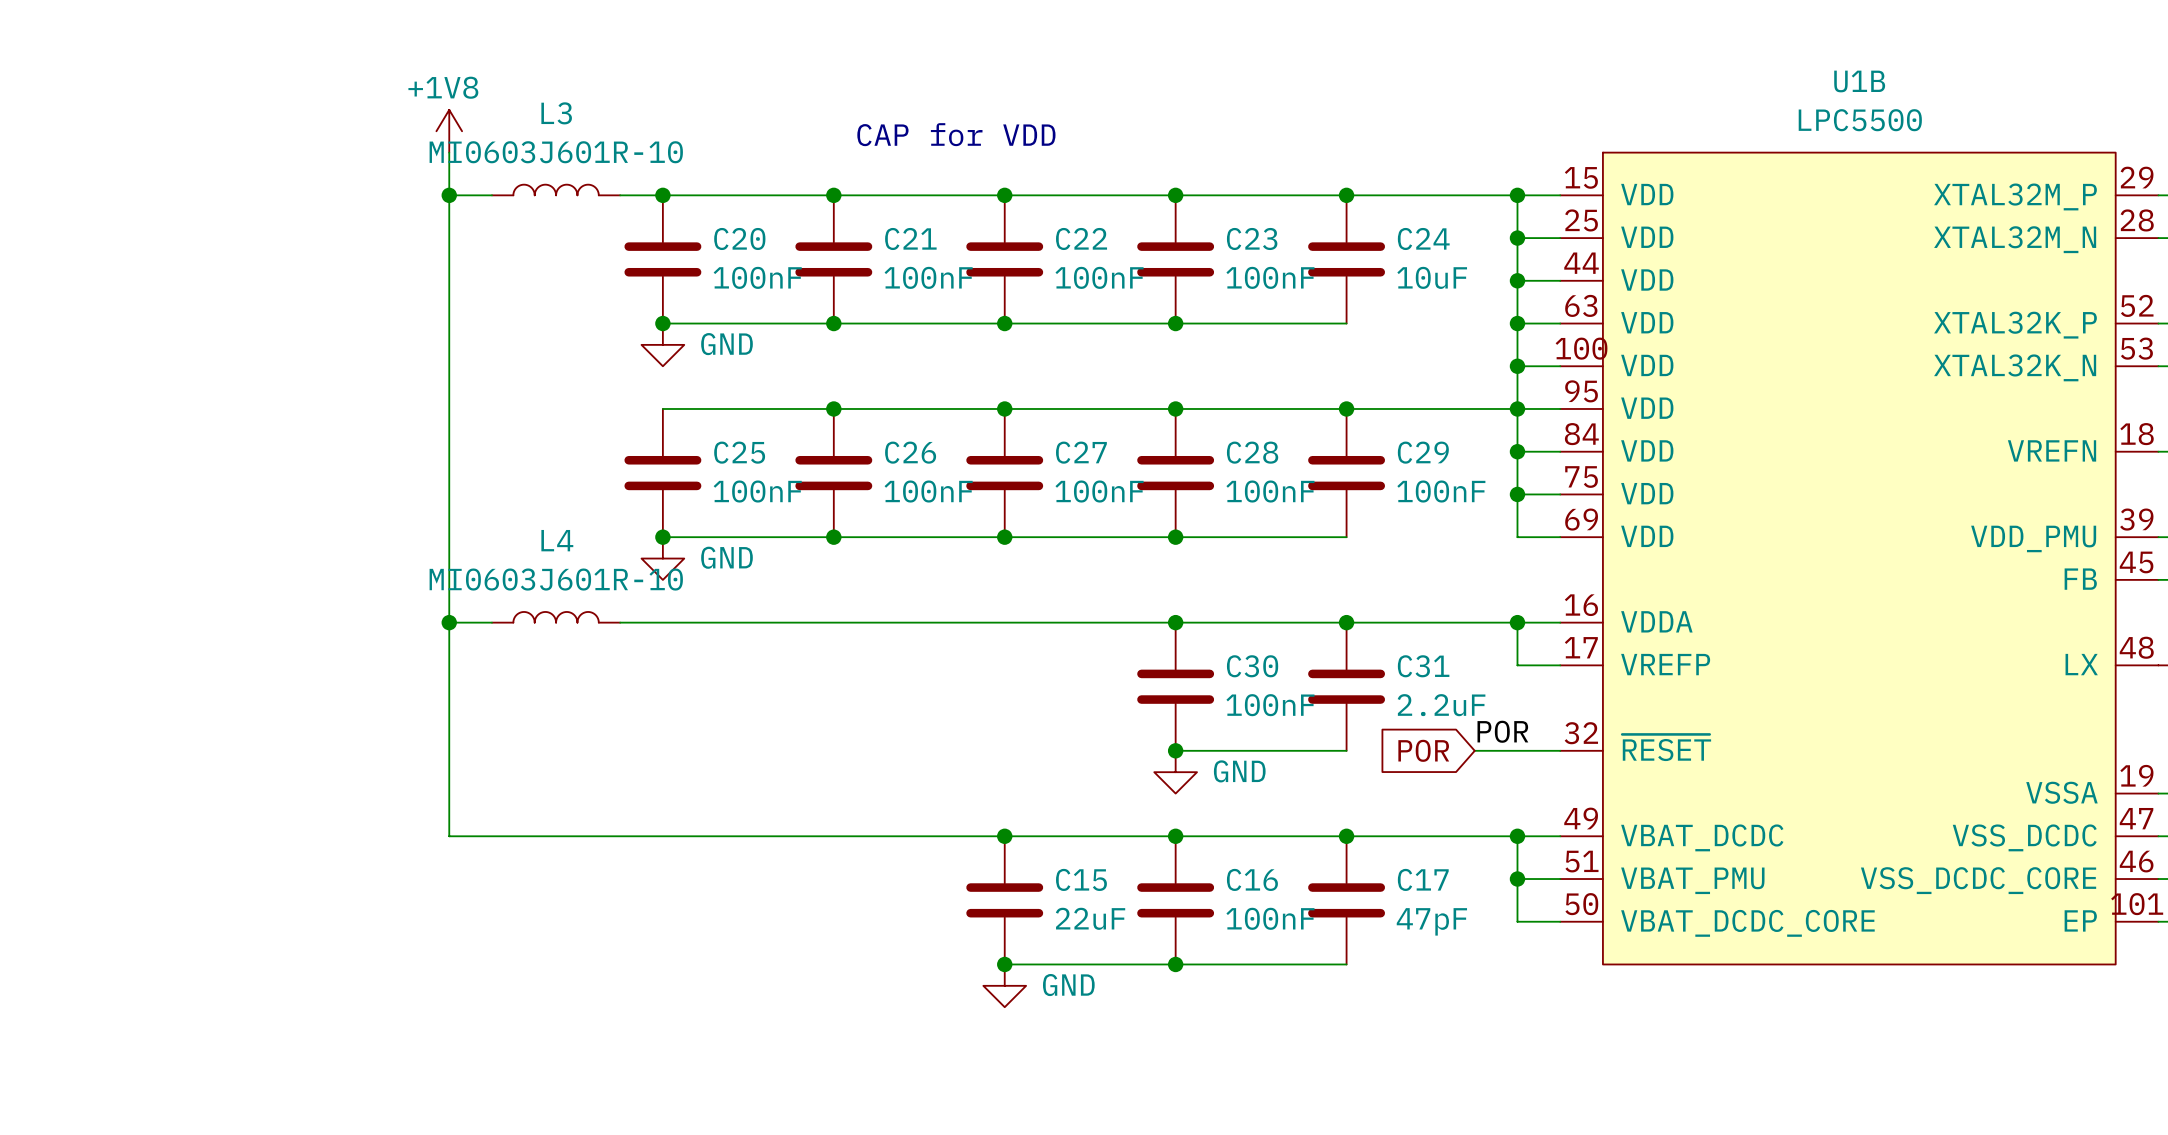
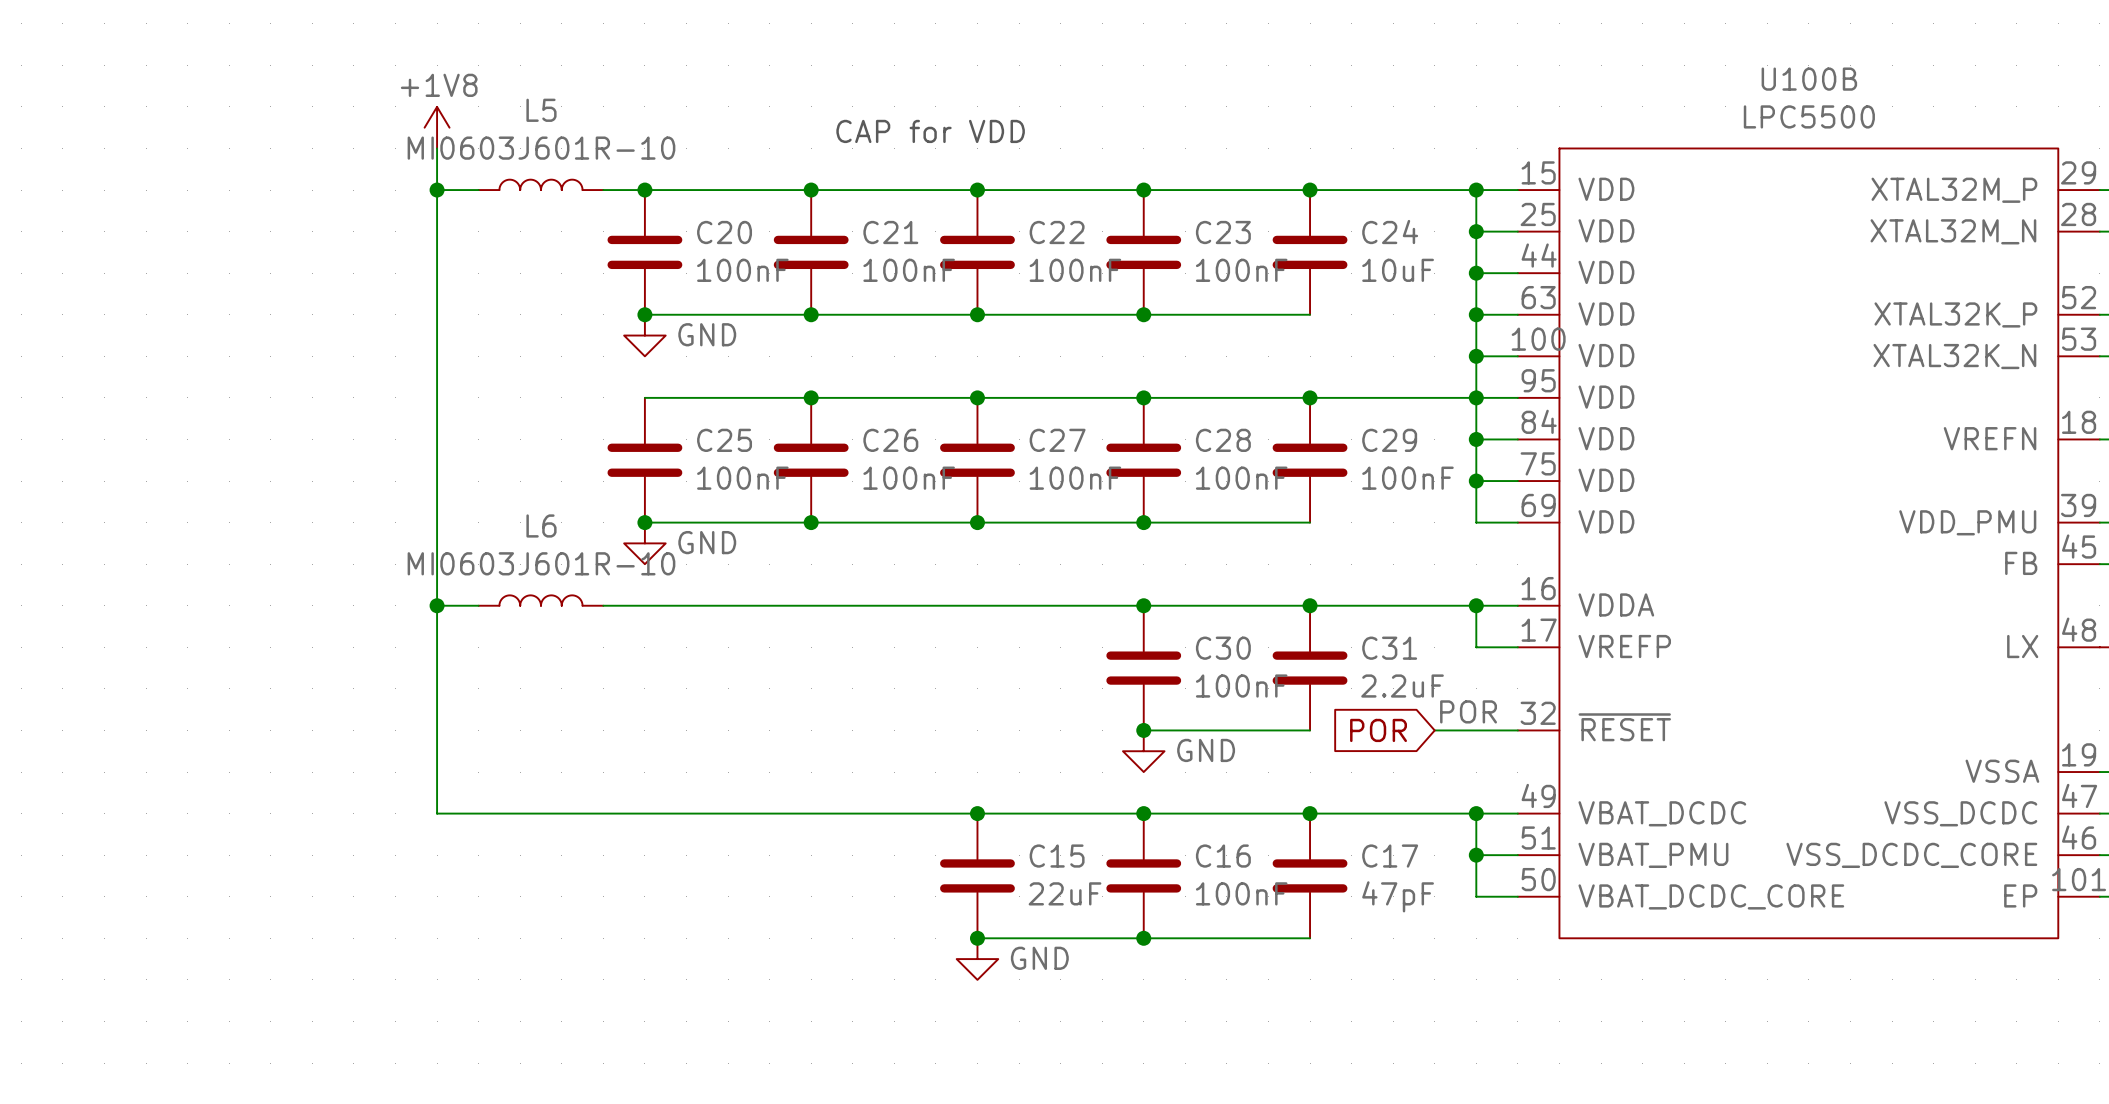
U1B name: U1B (1859, 81) -> U100B (1809, 79)
L3 name: L3 (556, 113) -> L5 (541, 110)
L4 name: L4 (557, 540) -> L6 (541, 525)

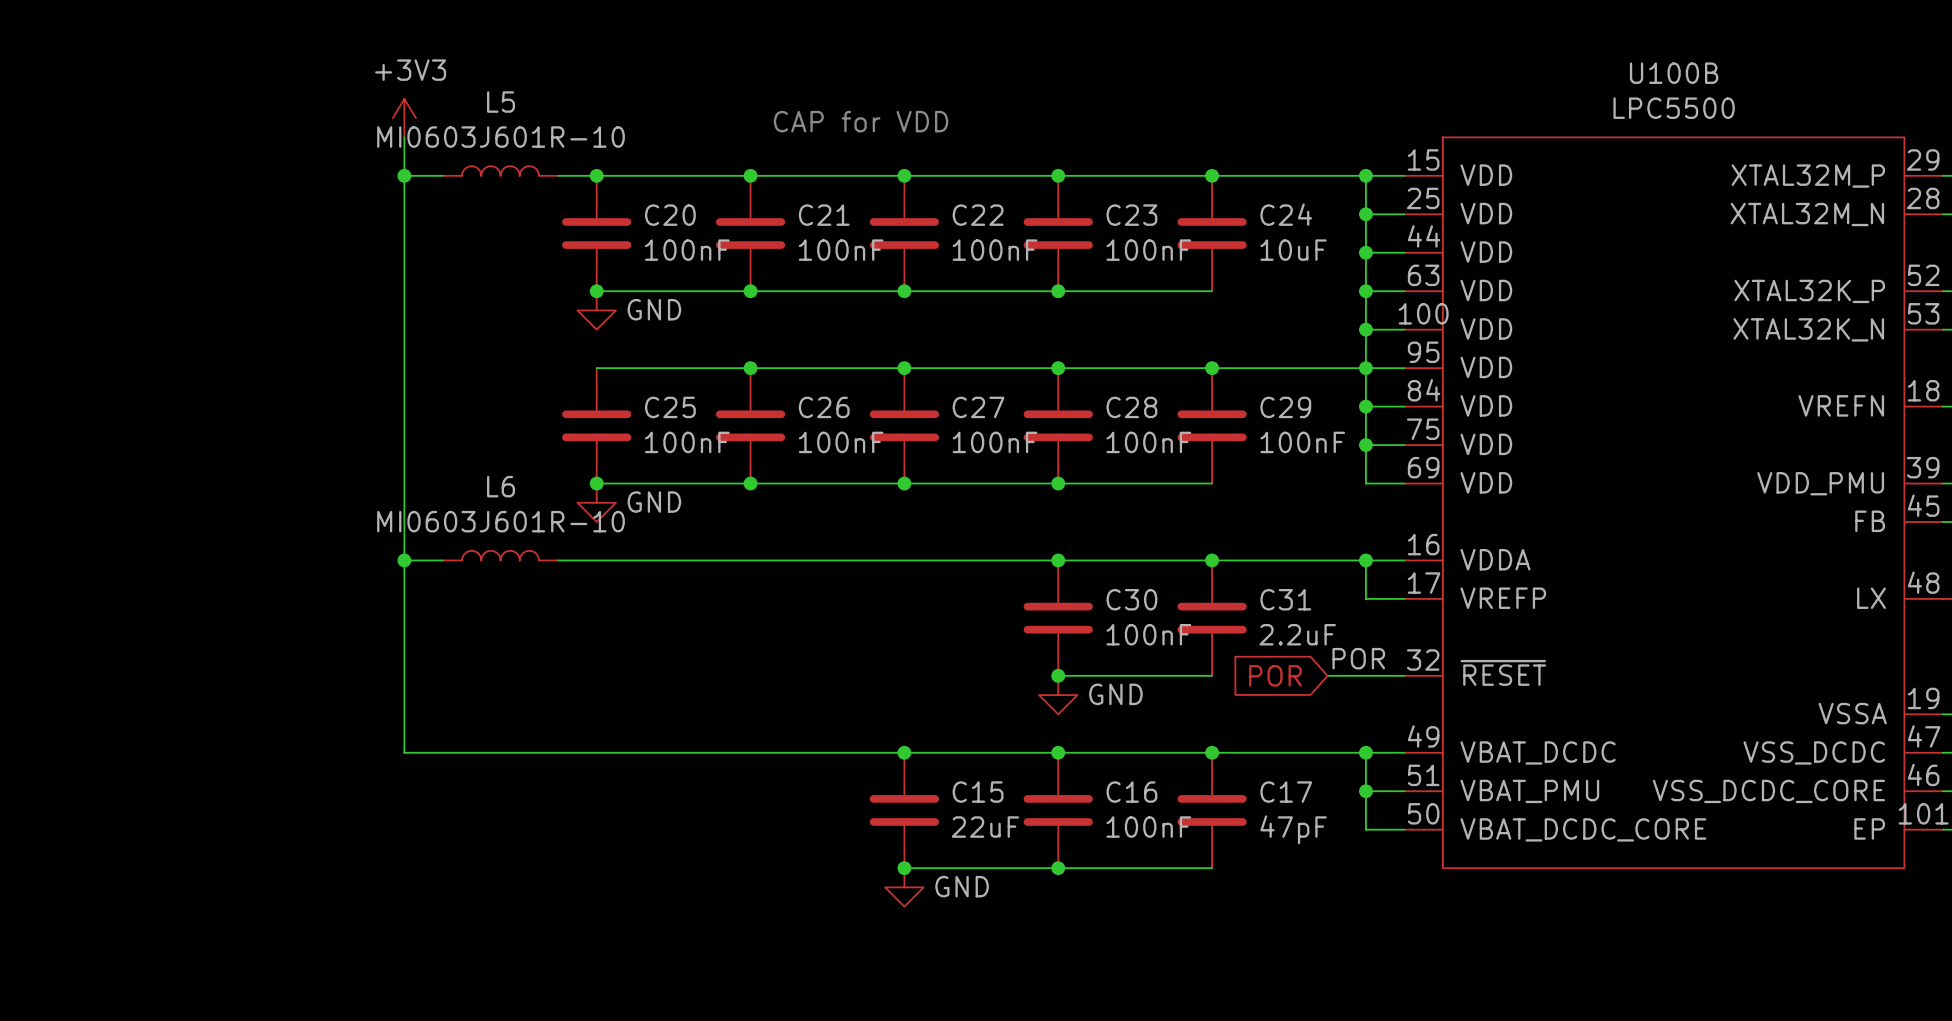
power symbol: +1V8 (437, 127) -> +3V3 (404, 118)

